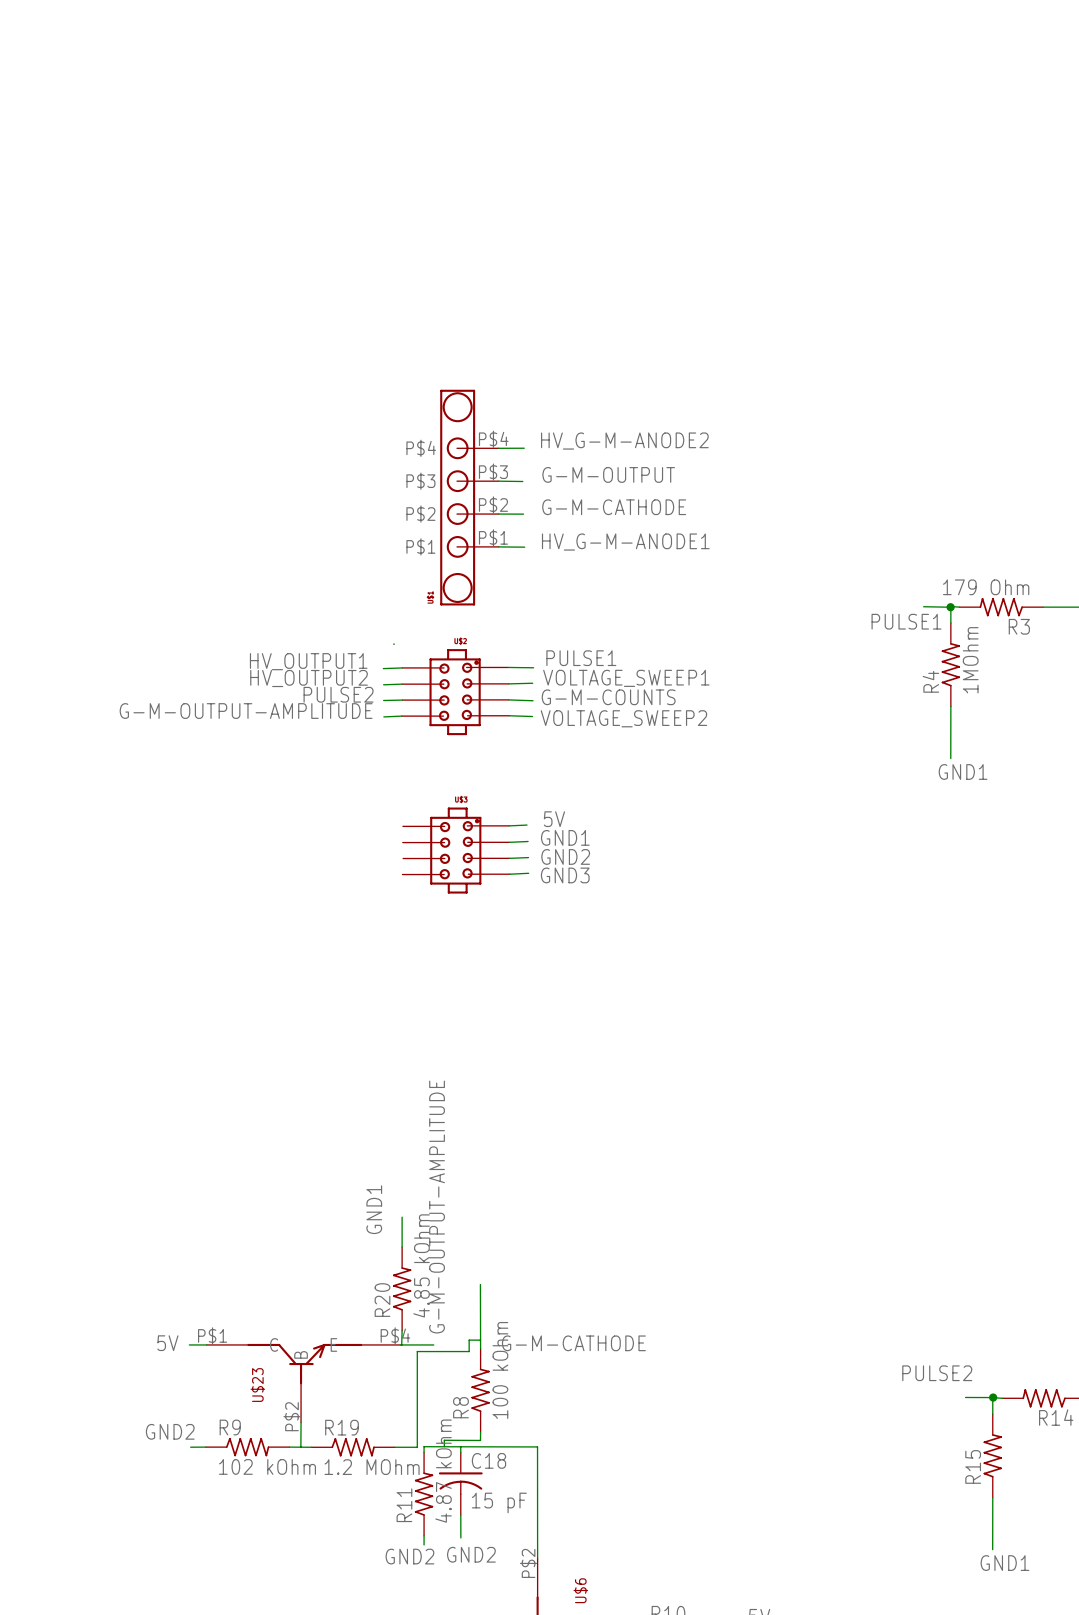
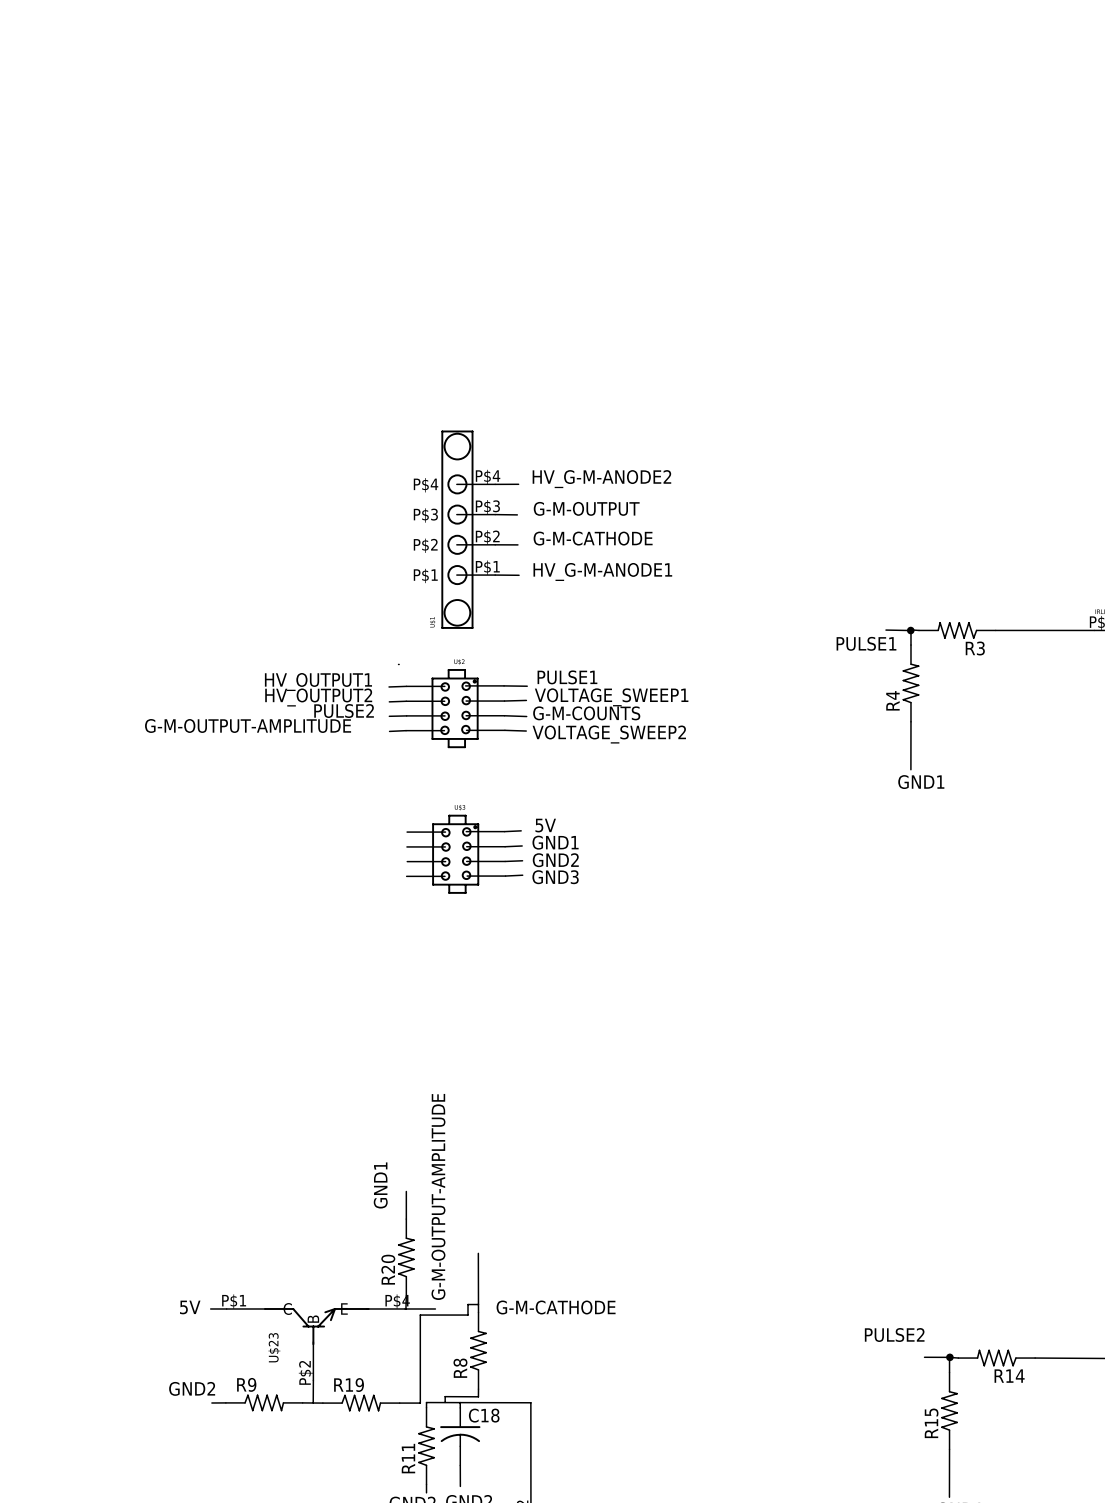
R3 value: 179 Ohm (986, 587) -> none
R4 value: 1MOhm (970, 660) -> none
R20 value: 4.85 kOhm (421, 1265) -> none
R8 value: 100 kOhm (500, 1370) -> none
R9 value: 102 kOhm (267, 1466) -> none
R19 value: 1.2 MOhm (372, 1467) -> none
R11 value: 4.87 kOhm (443, 1471) -> none
C18 value: 15 pF (499, 1502) -> none

